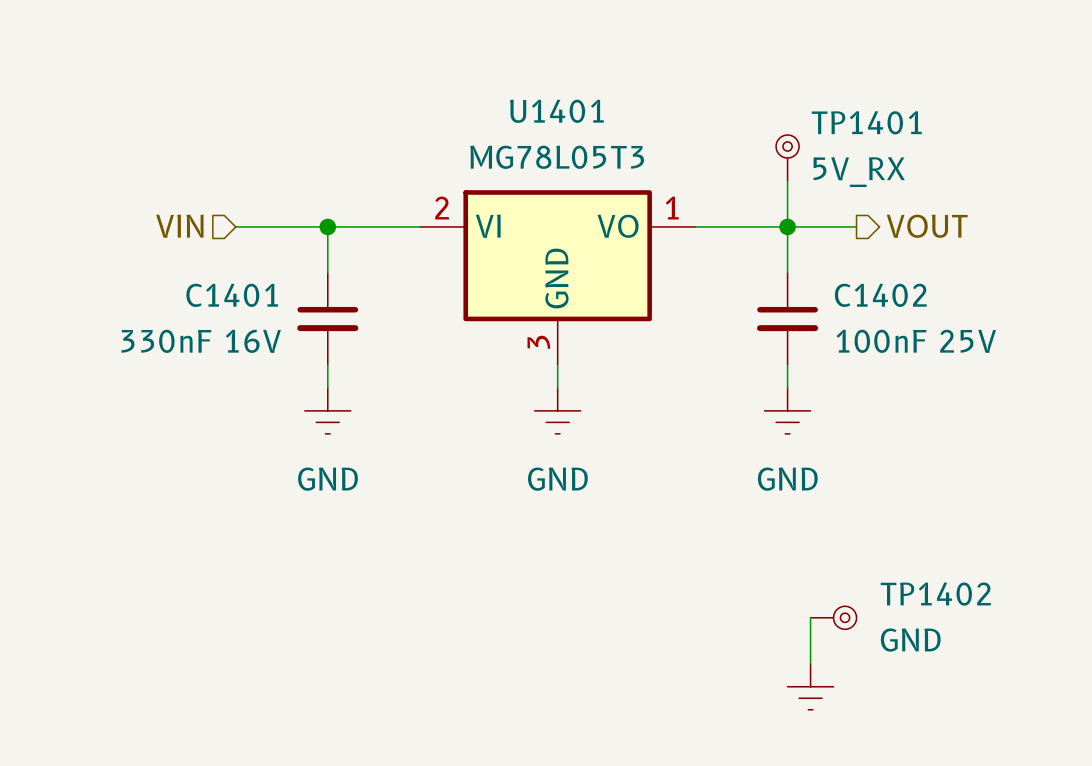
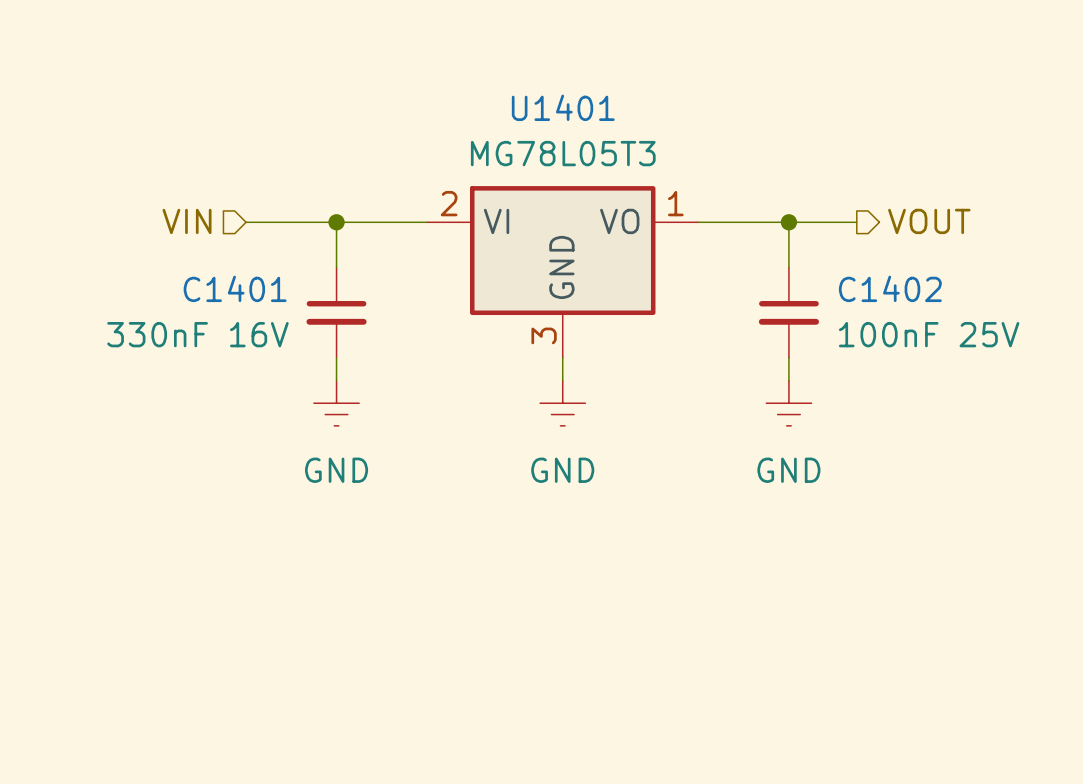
TP1401: 5V_RX (787, 158) -> none
wire: (787, 180) (787, 226) -> none
wire: (810, 617) (810, 663) -> none
TP1402: GND (833, 617) -> none
power symbol: (810, 686) -> none

